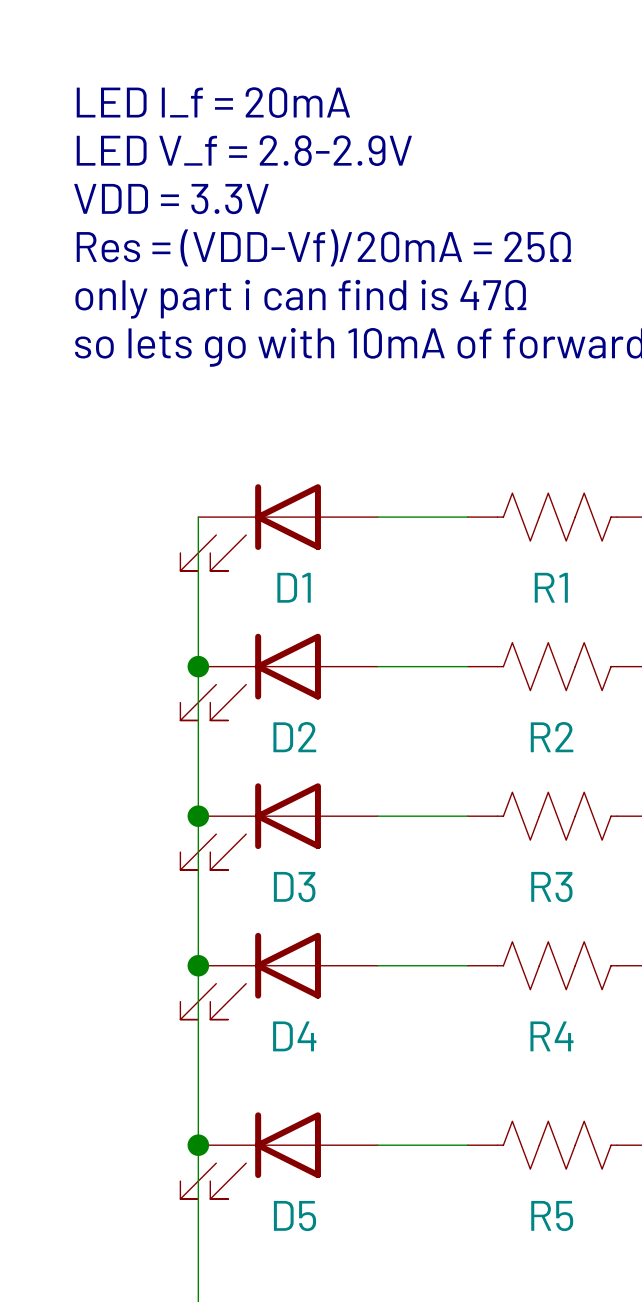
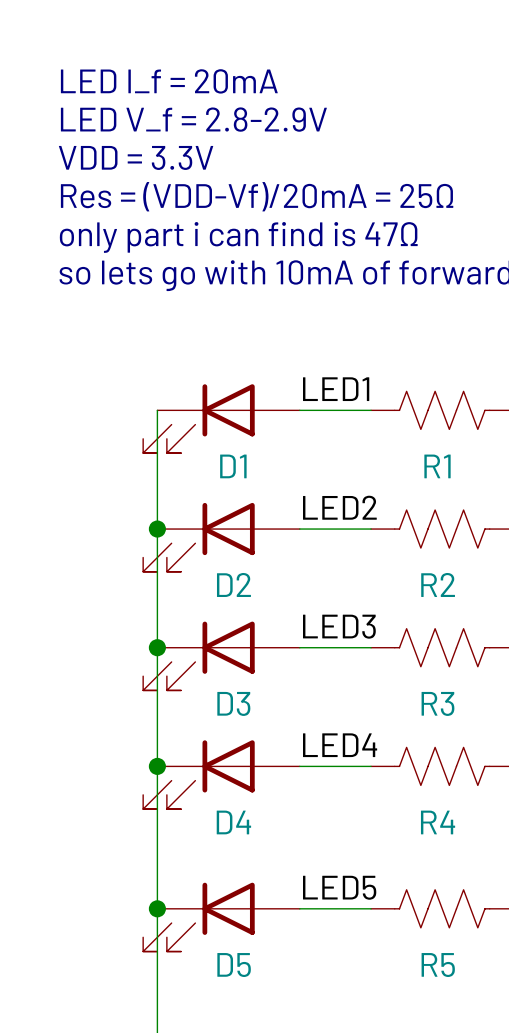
label: none -> LED1 (336, 389)
label: none -> LED2 (339, 507)
label: none -> LED3 (339, 626)
label: none -> LED4 (340, 745)
label: none -> LED5 (339, 887)

